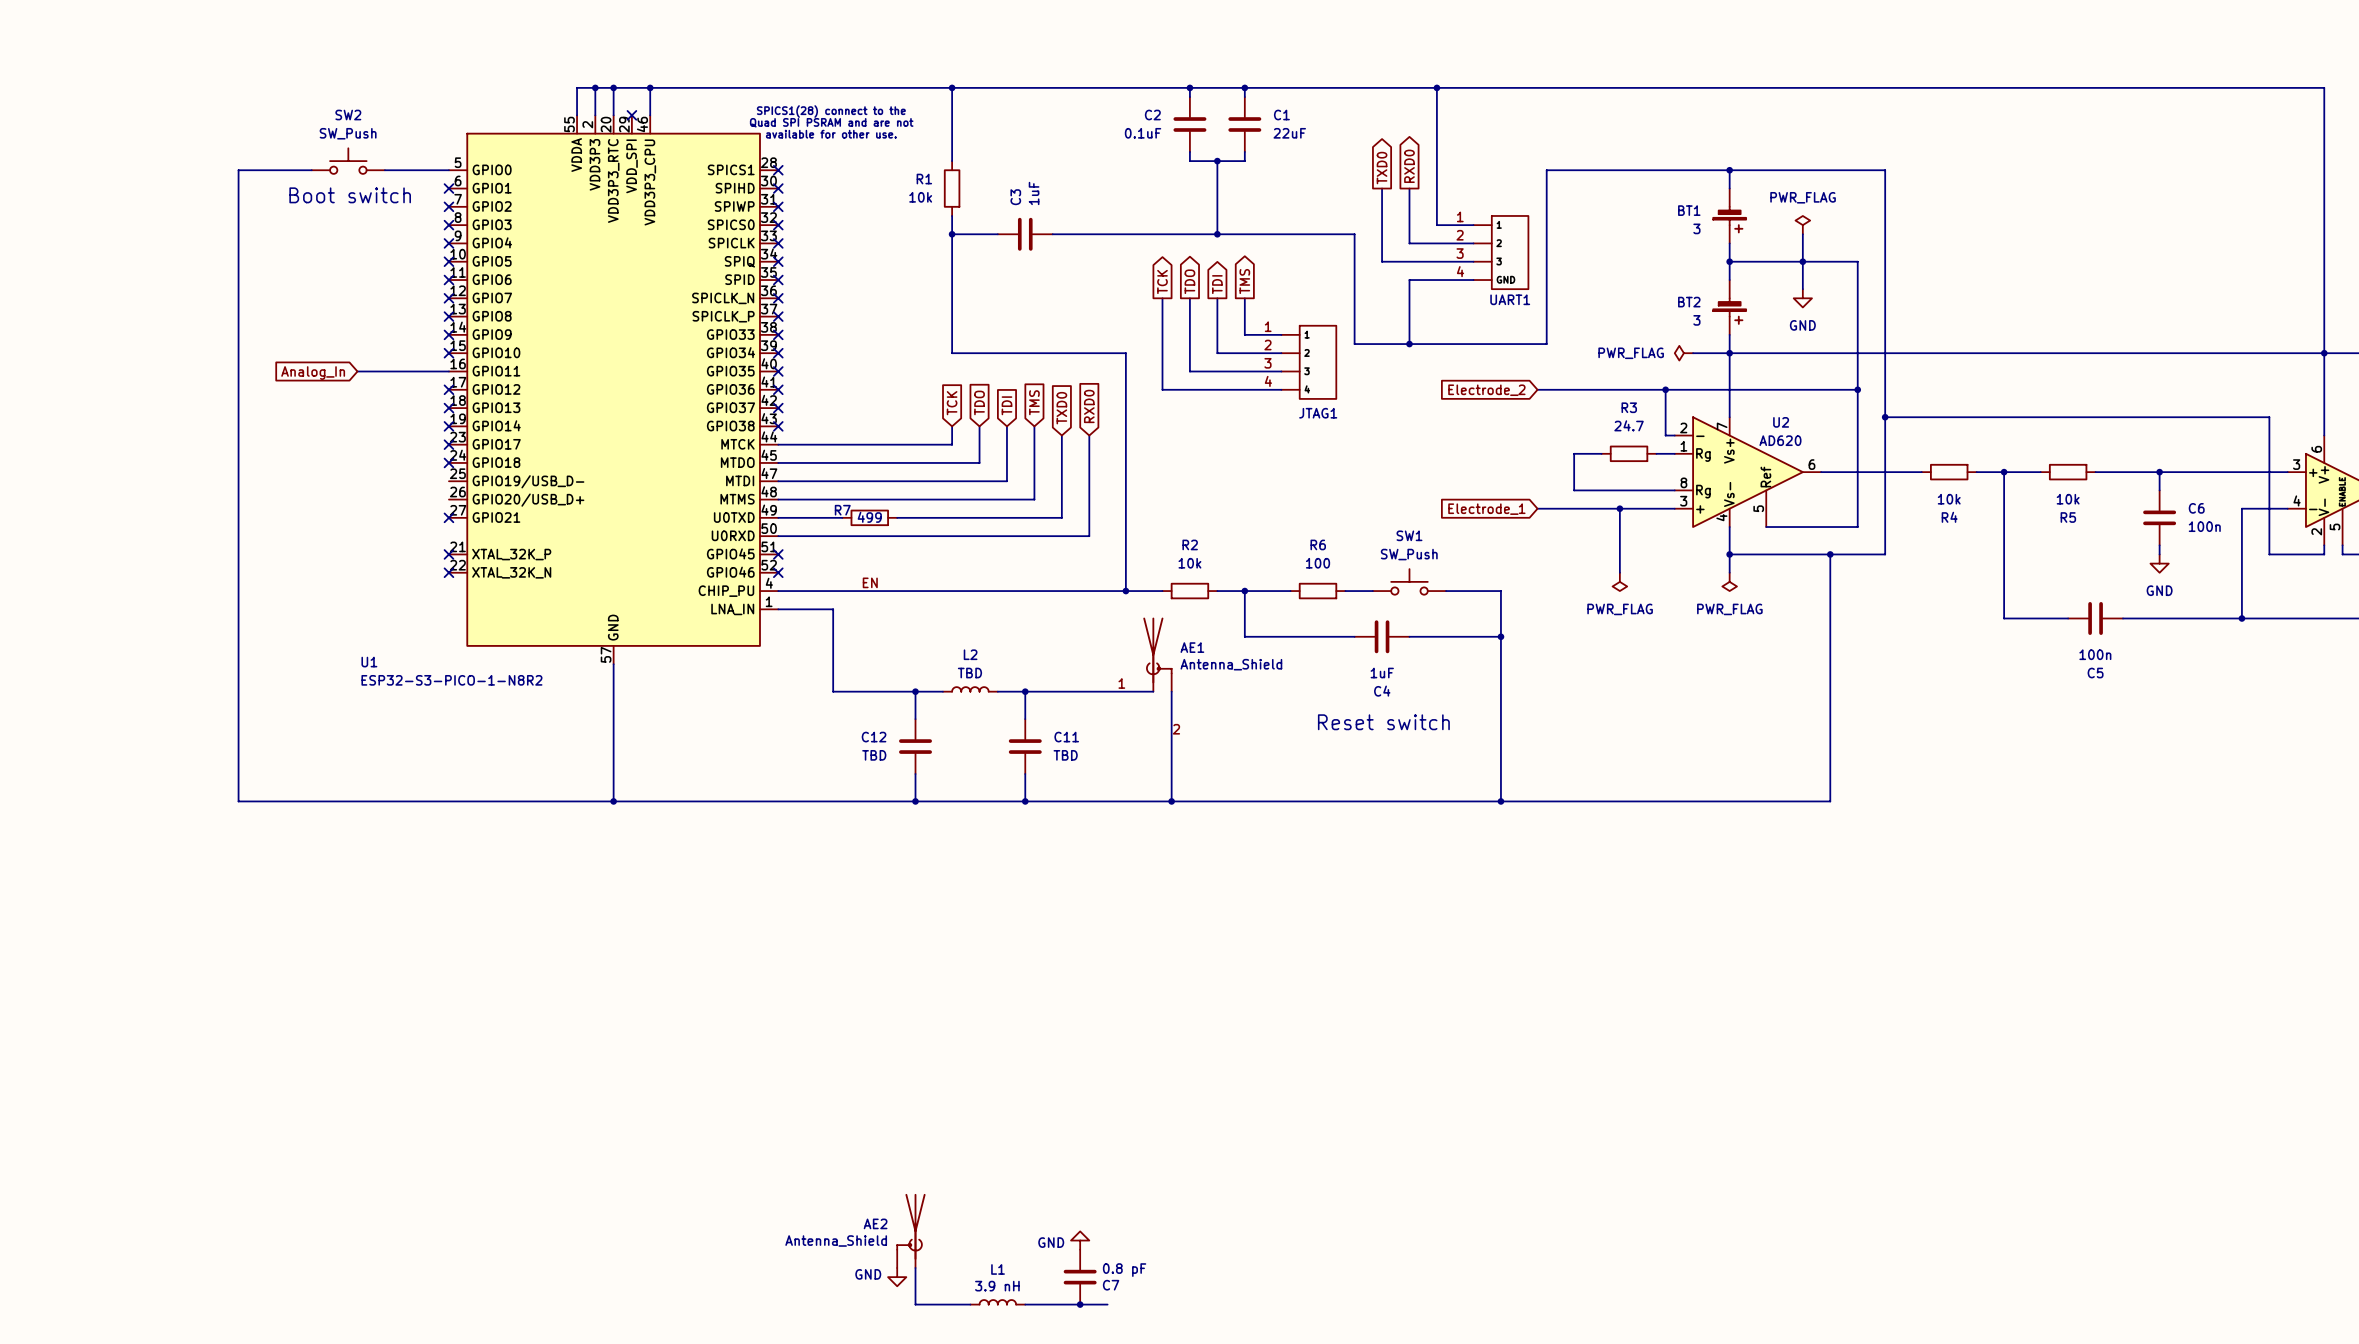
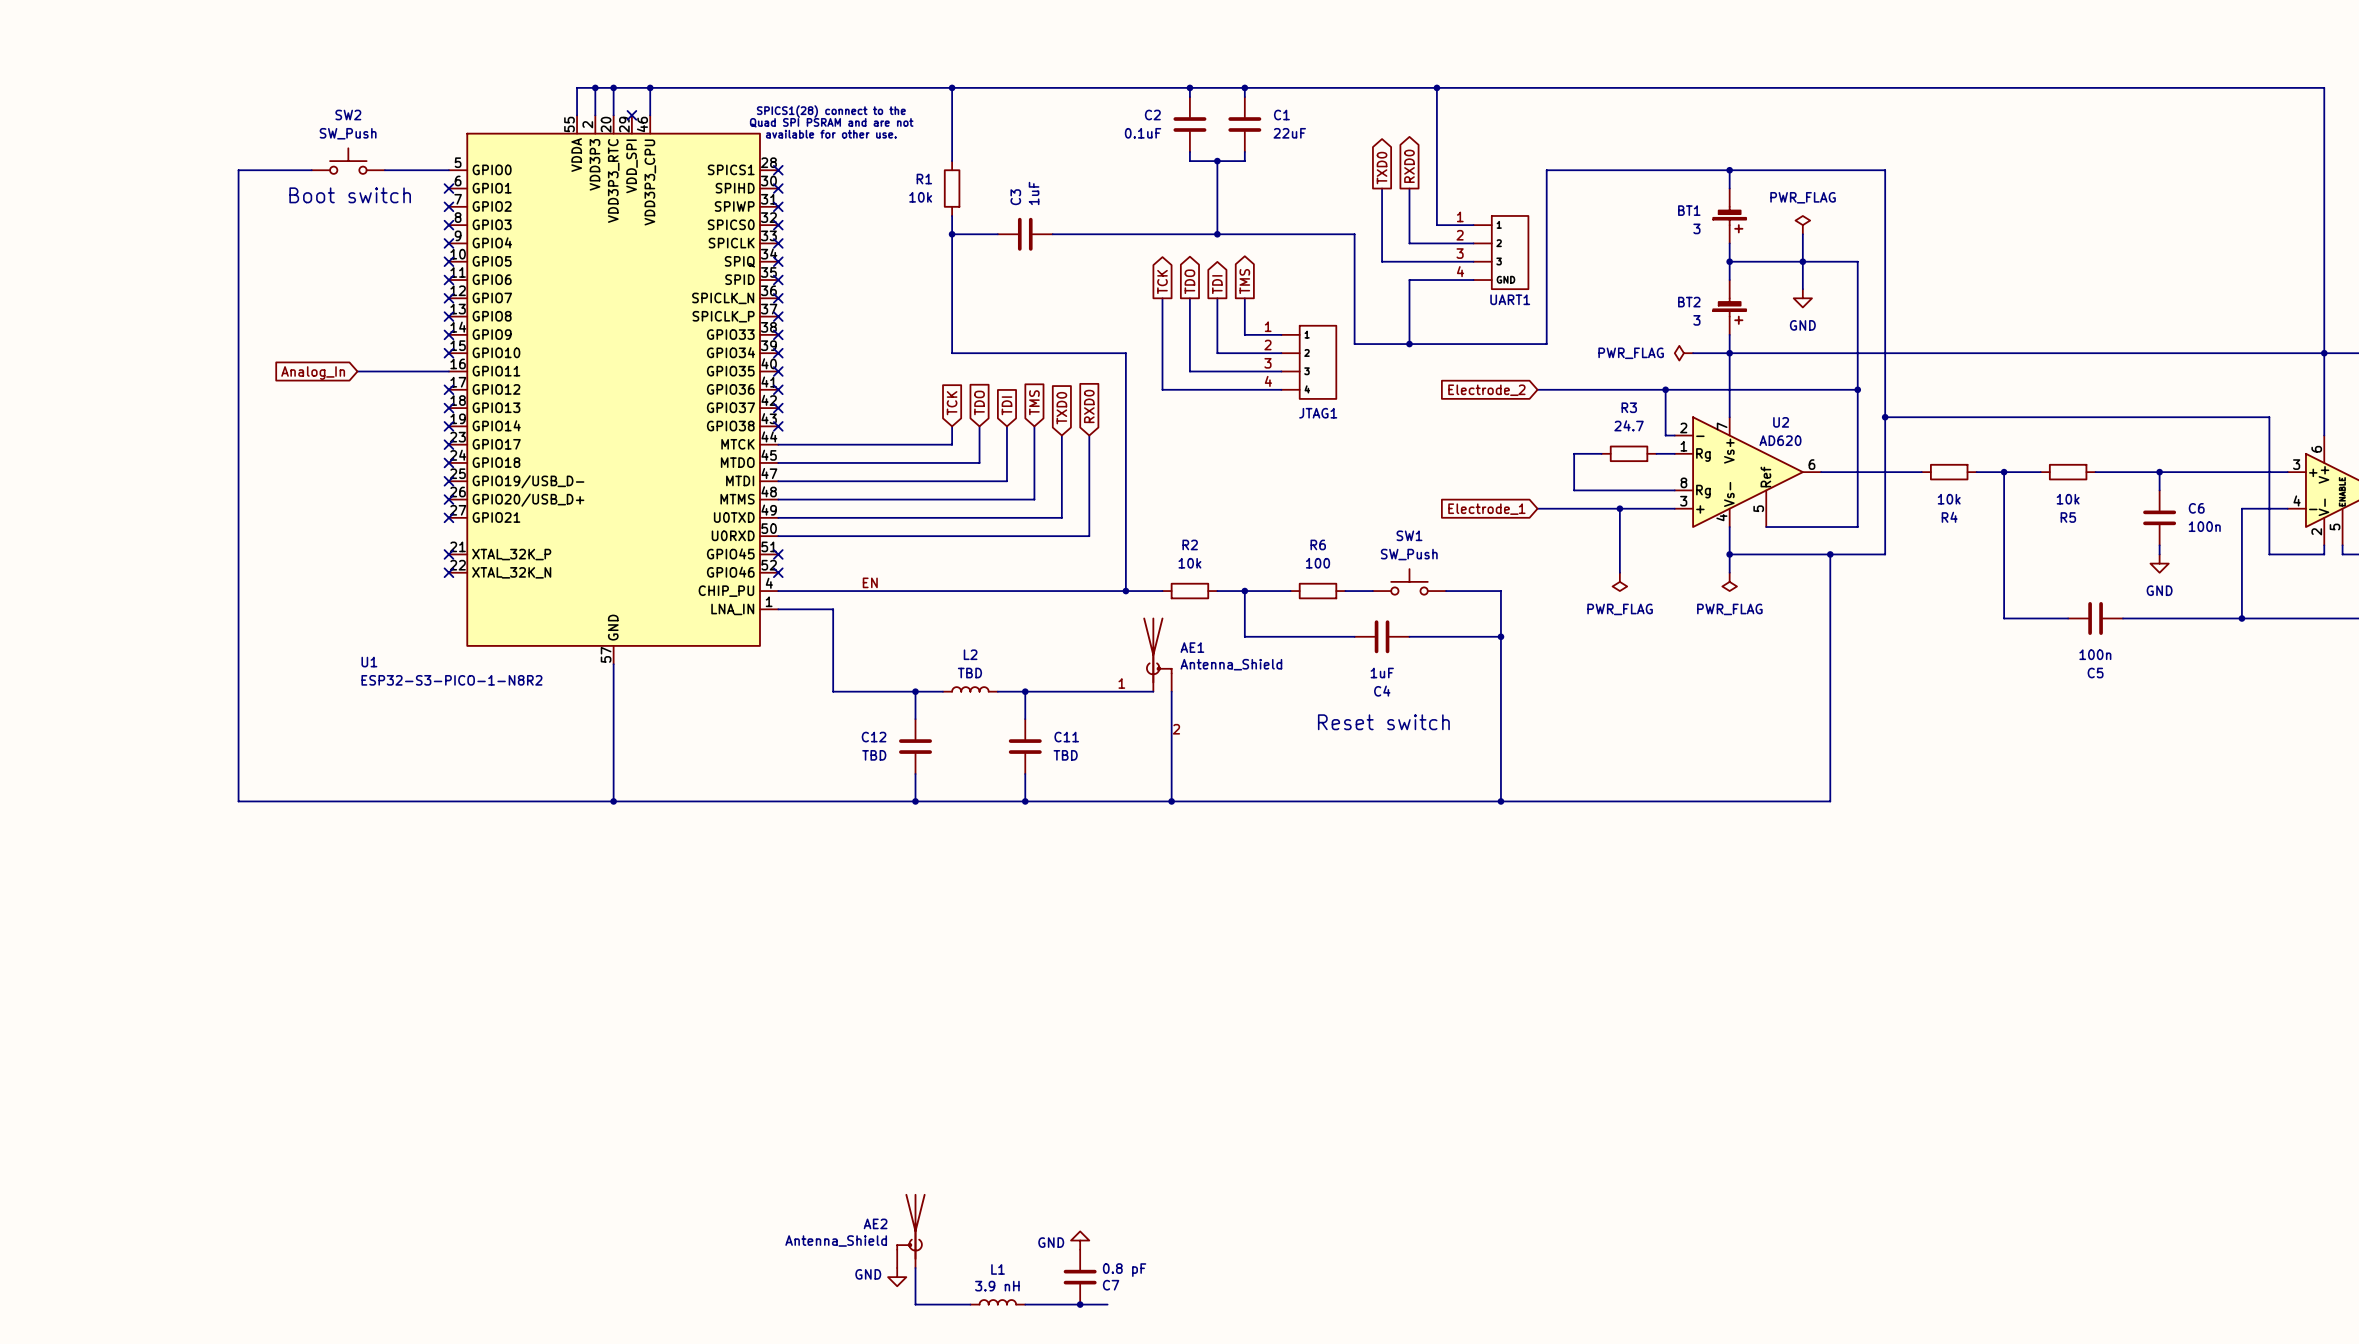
no-connect mark: none -> (448, 481)
no-connect mark: none -> (448, 499)
R7: 499 (869, 517) -> none

